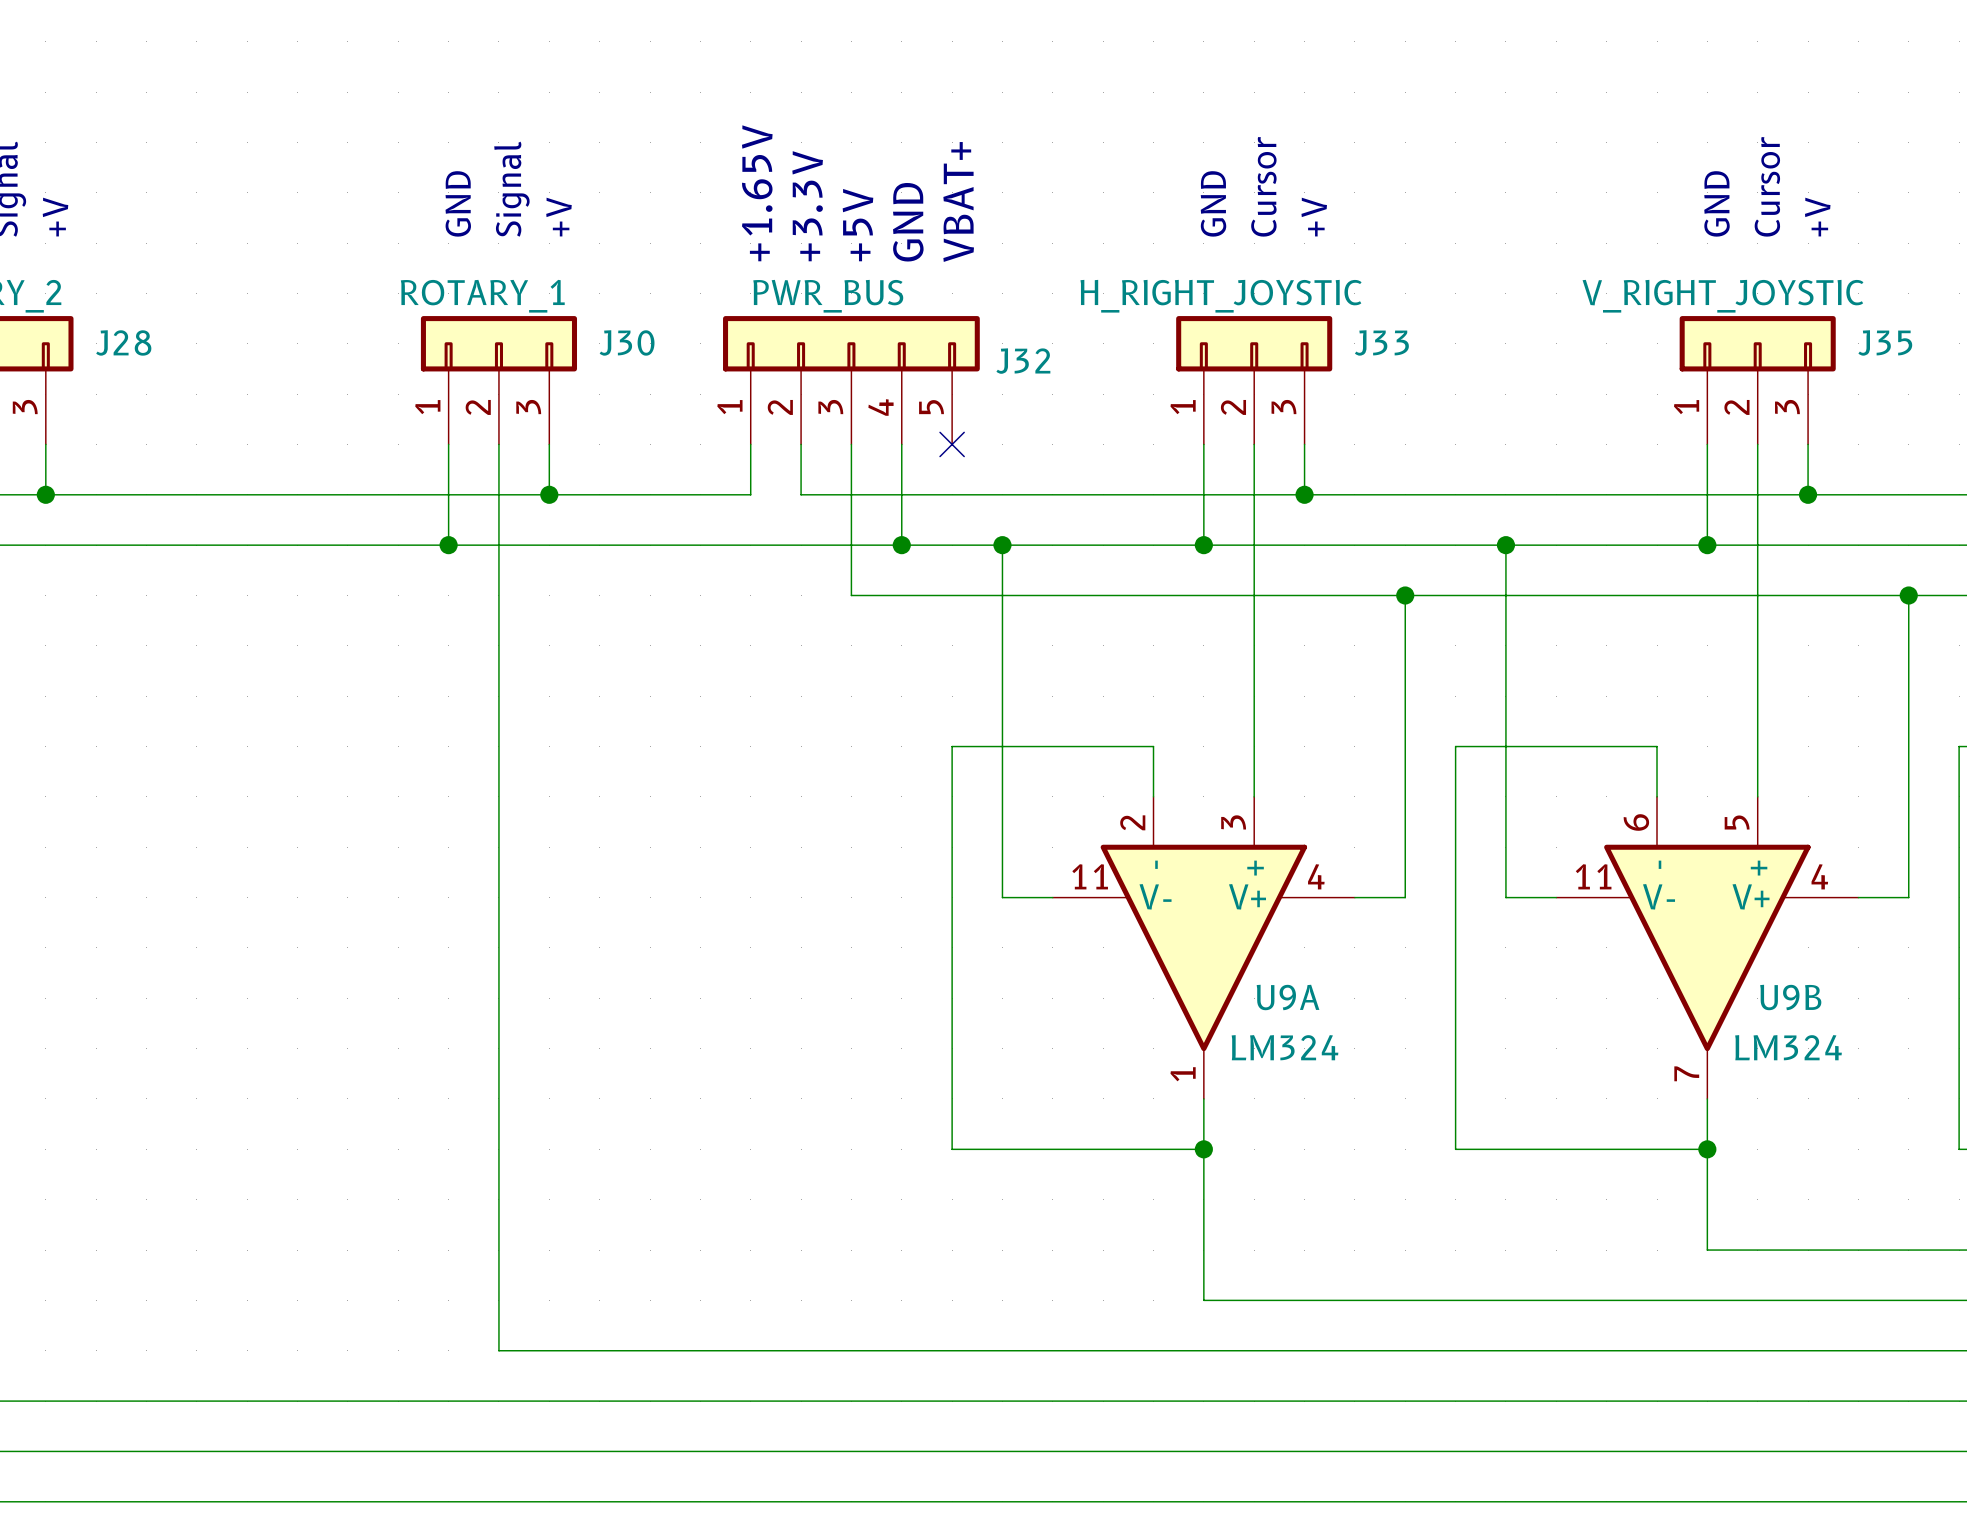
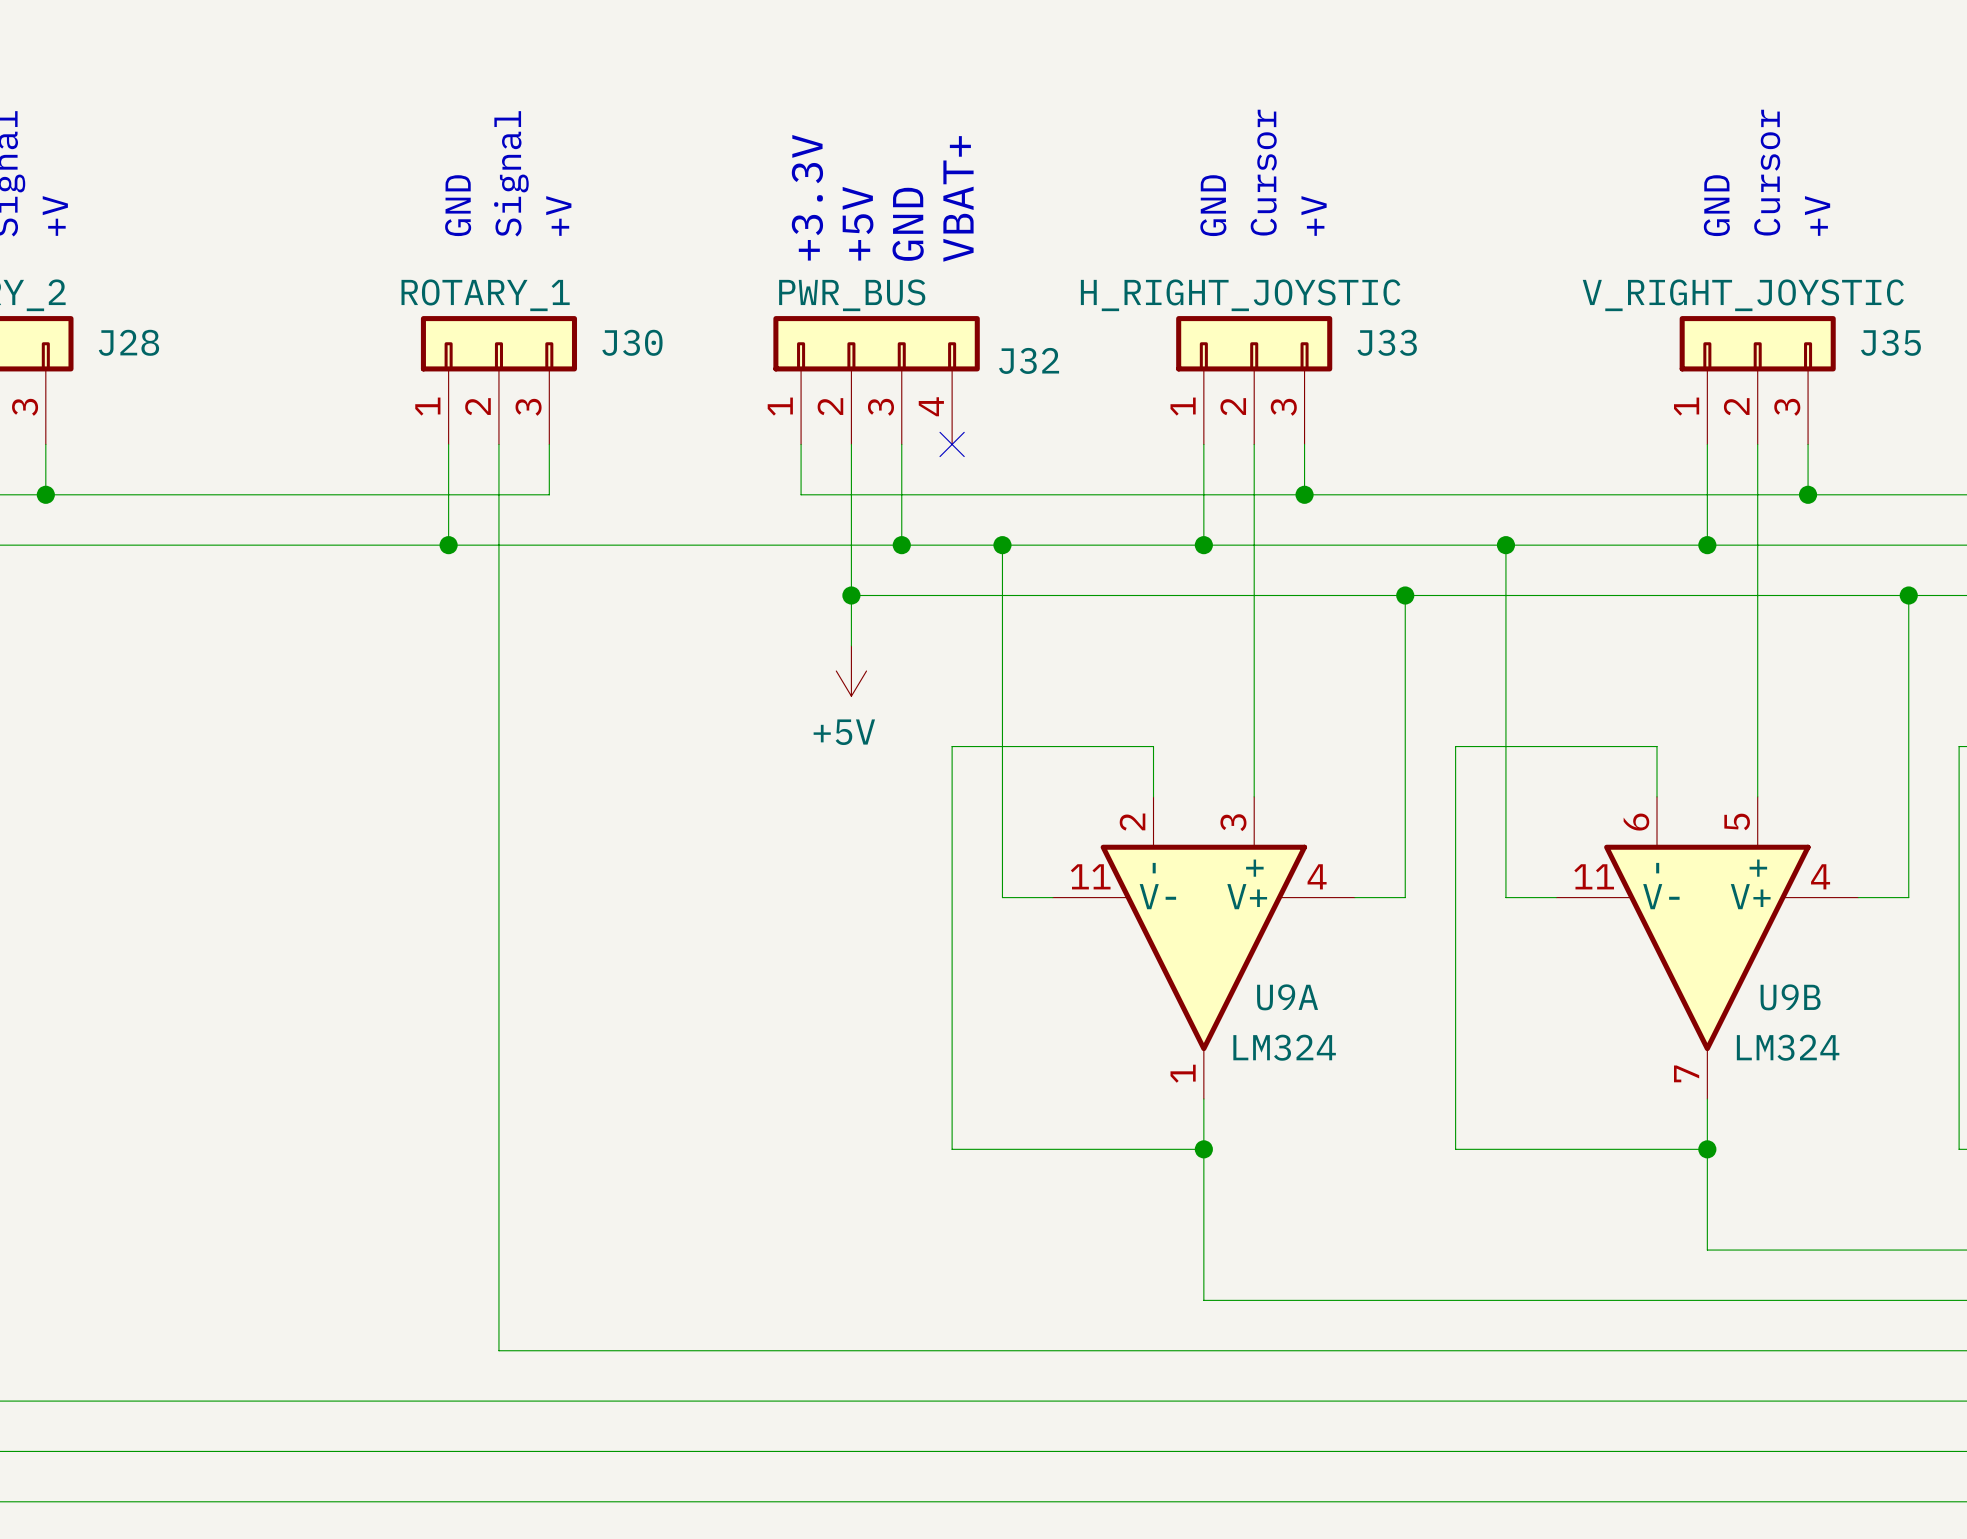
text: +1.65V (757, 193) -> none
J32 symbol: [723, 316, 980, 445] -> [773, 316, 980, 445]
wire: (750, 444) (750, 494) (549, 494) -> none
junction: (549, 494) -> none
wire: none -> (851, 595) (851, 645)
junction: none -> (851, 595)
power symbol: none -> +5V (851, 671)

